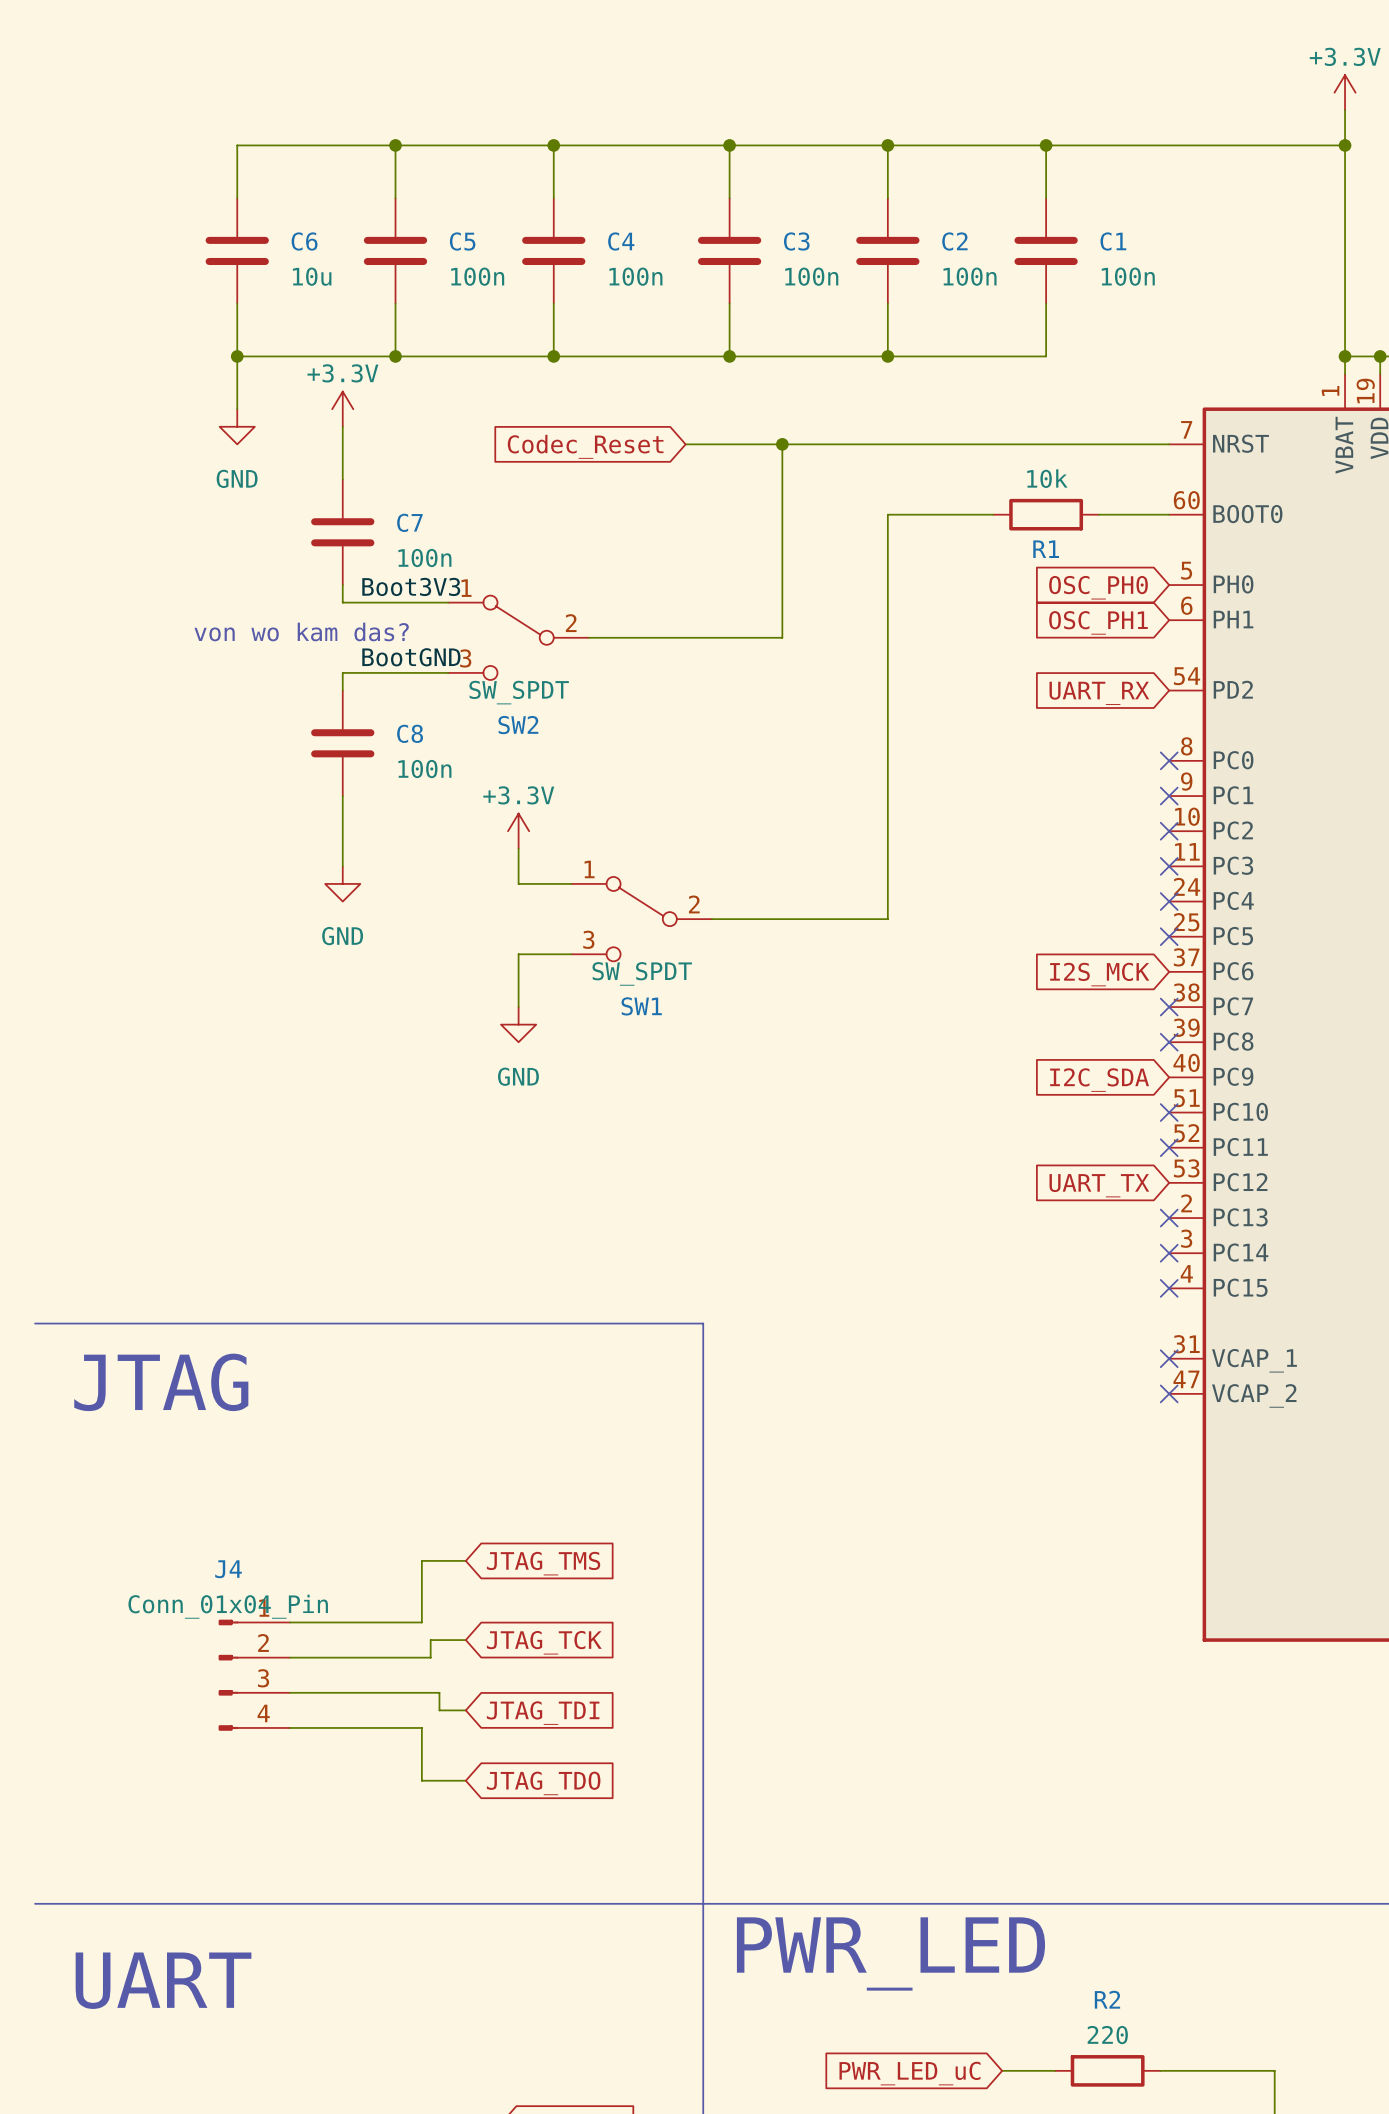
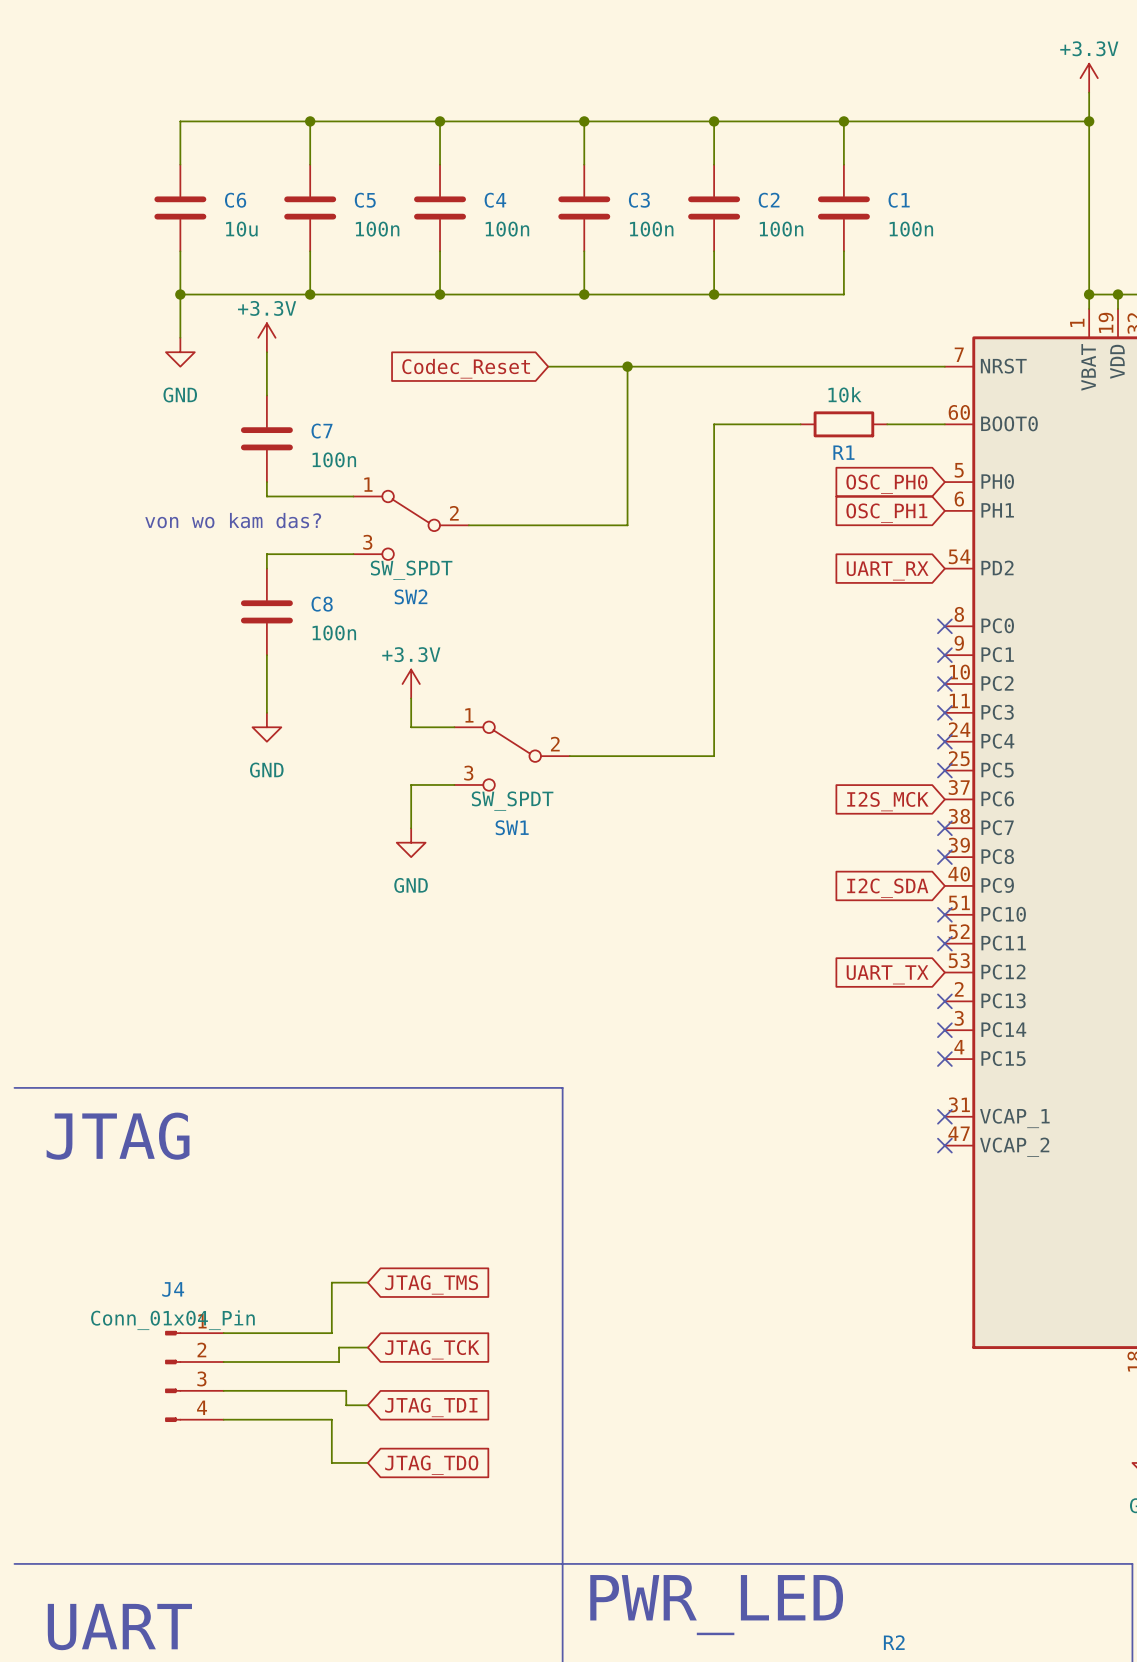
label: Boot3V3 (411, 586) -> none
label: BootGND (411, 657) -> none

